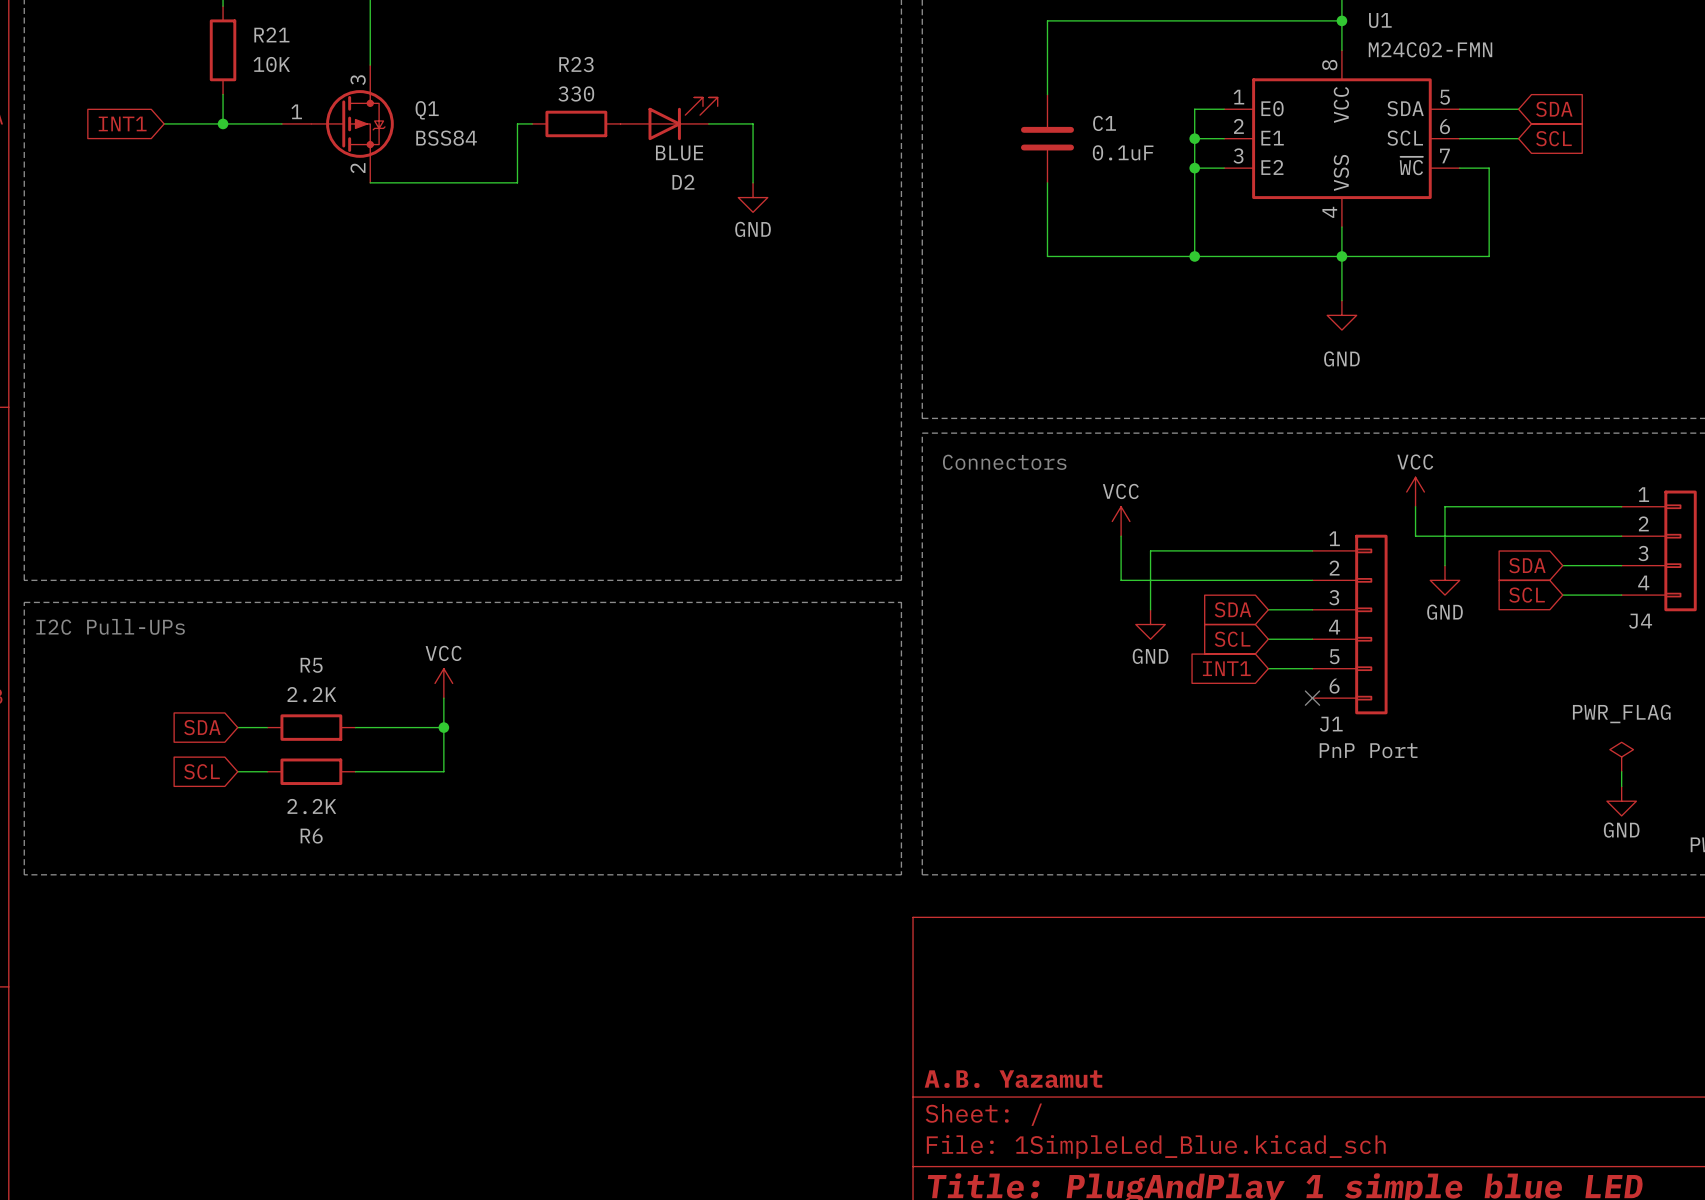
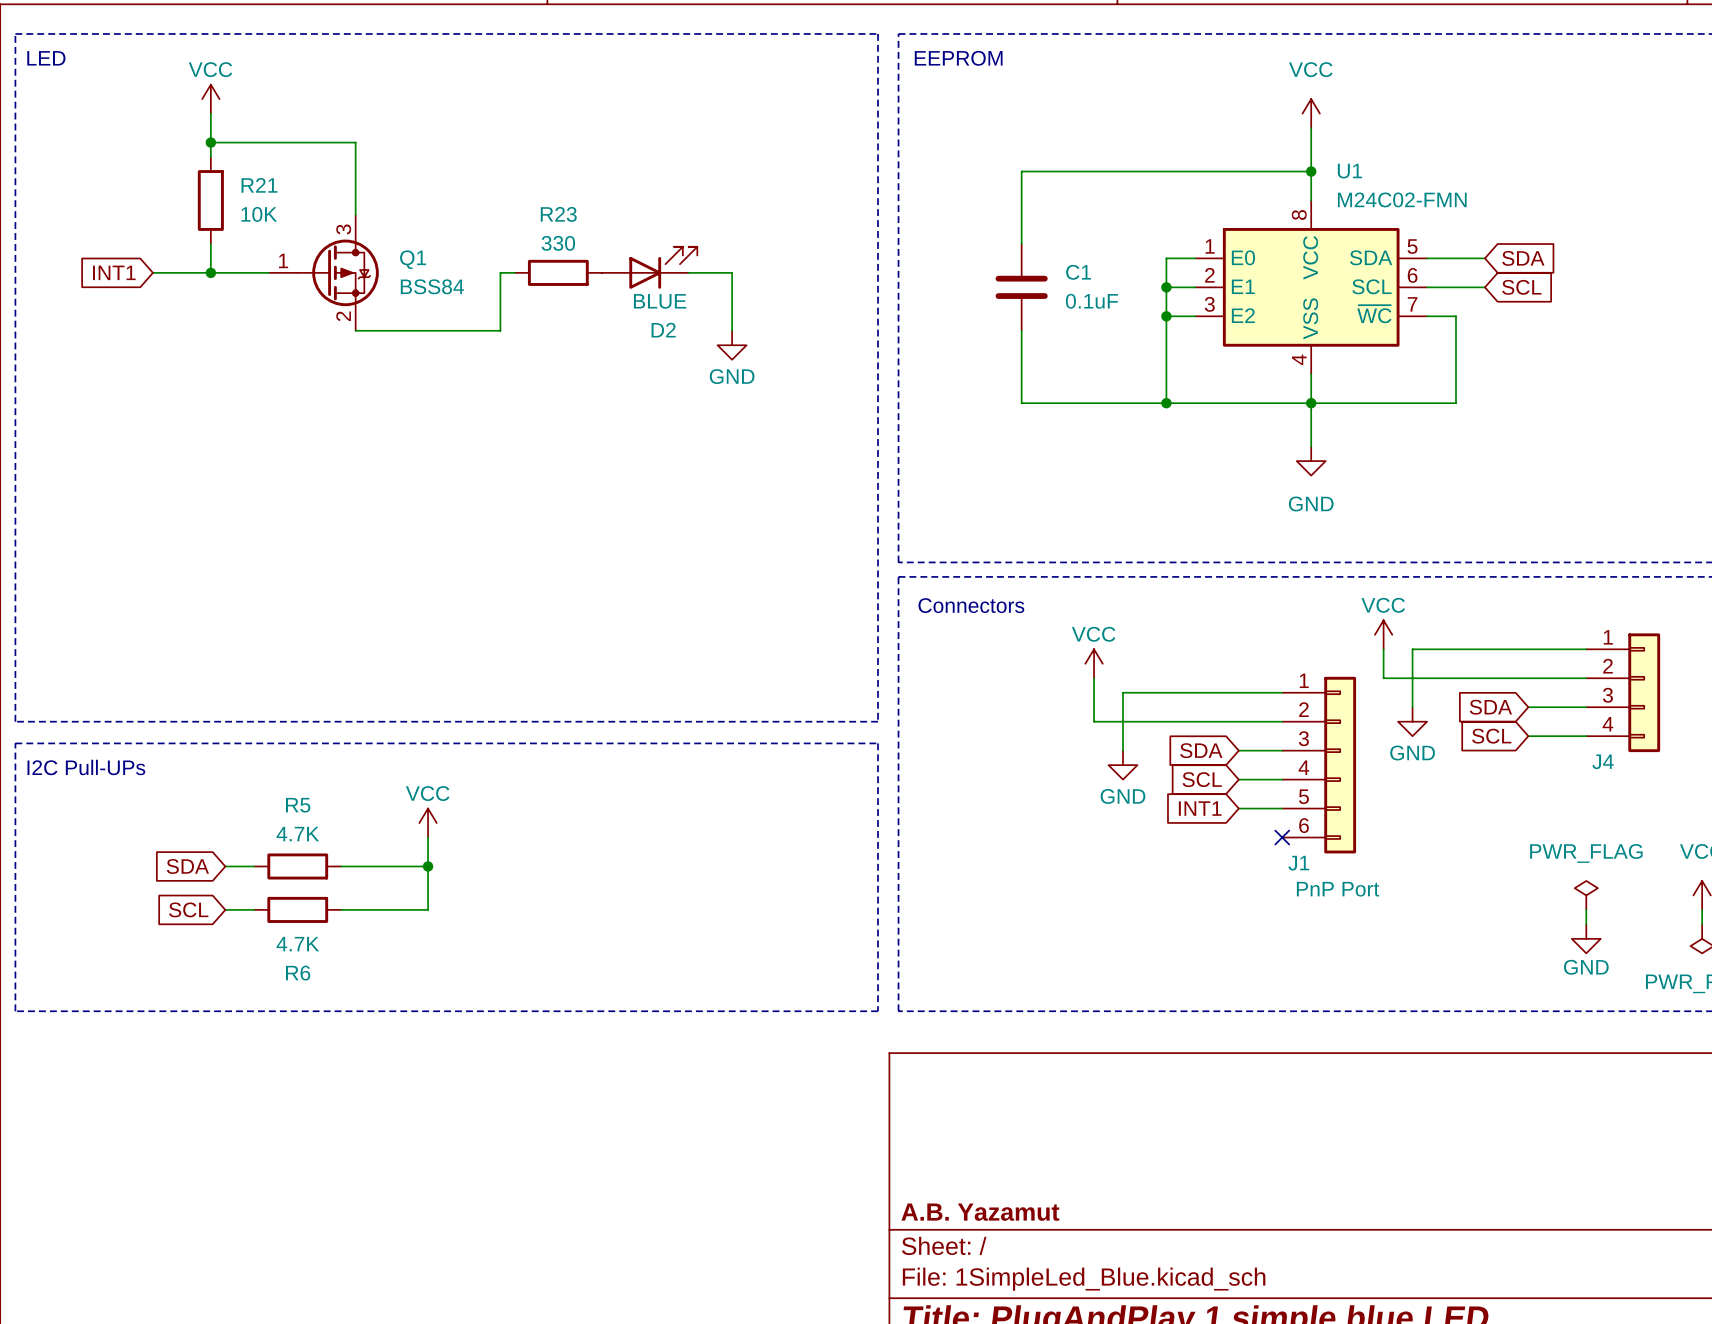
R5 value: 2.2K (311, 694) -> 4.7K (297, 834)
R6 value: 2.2K (311, 806) -> 4.7K (297, 944)

